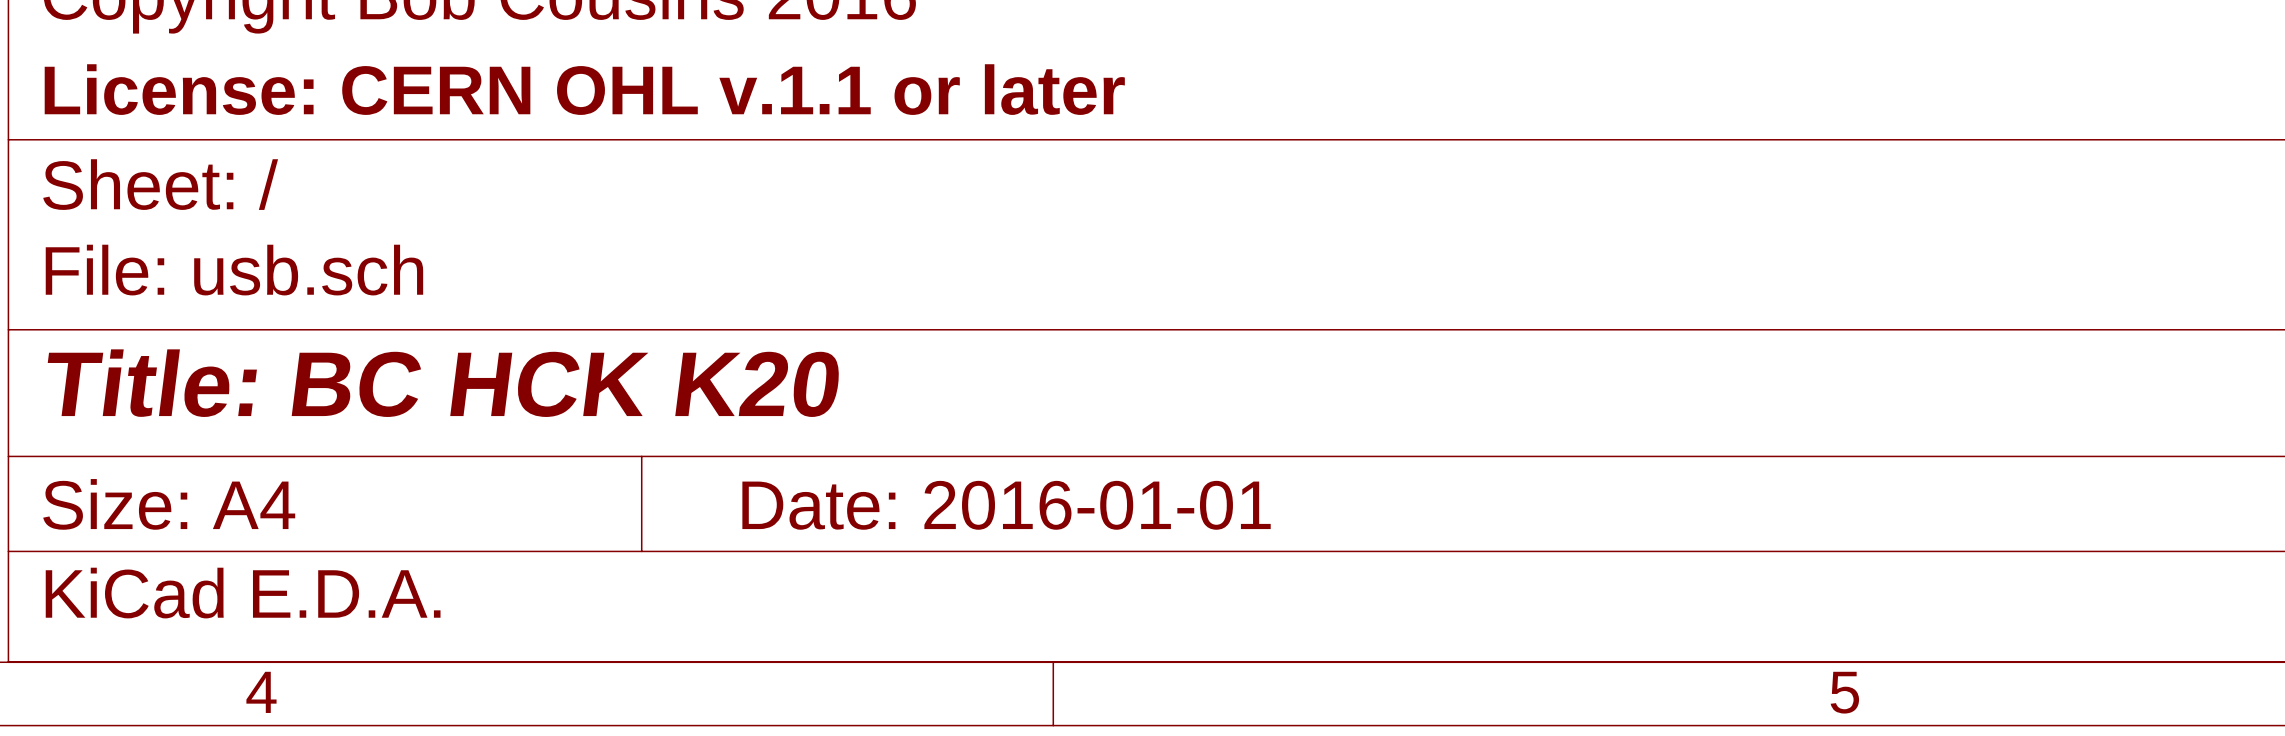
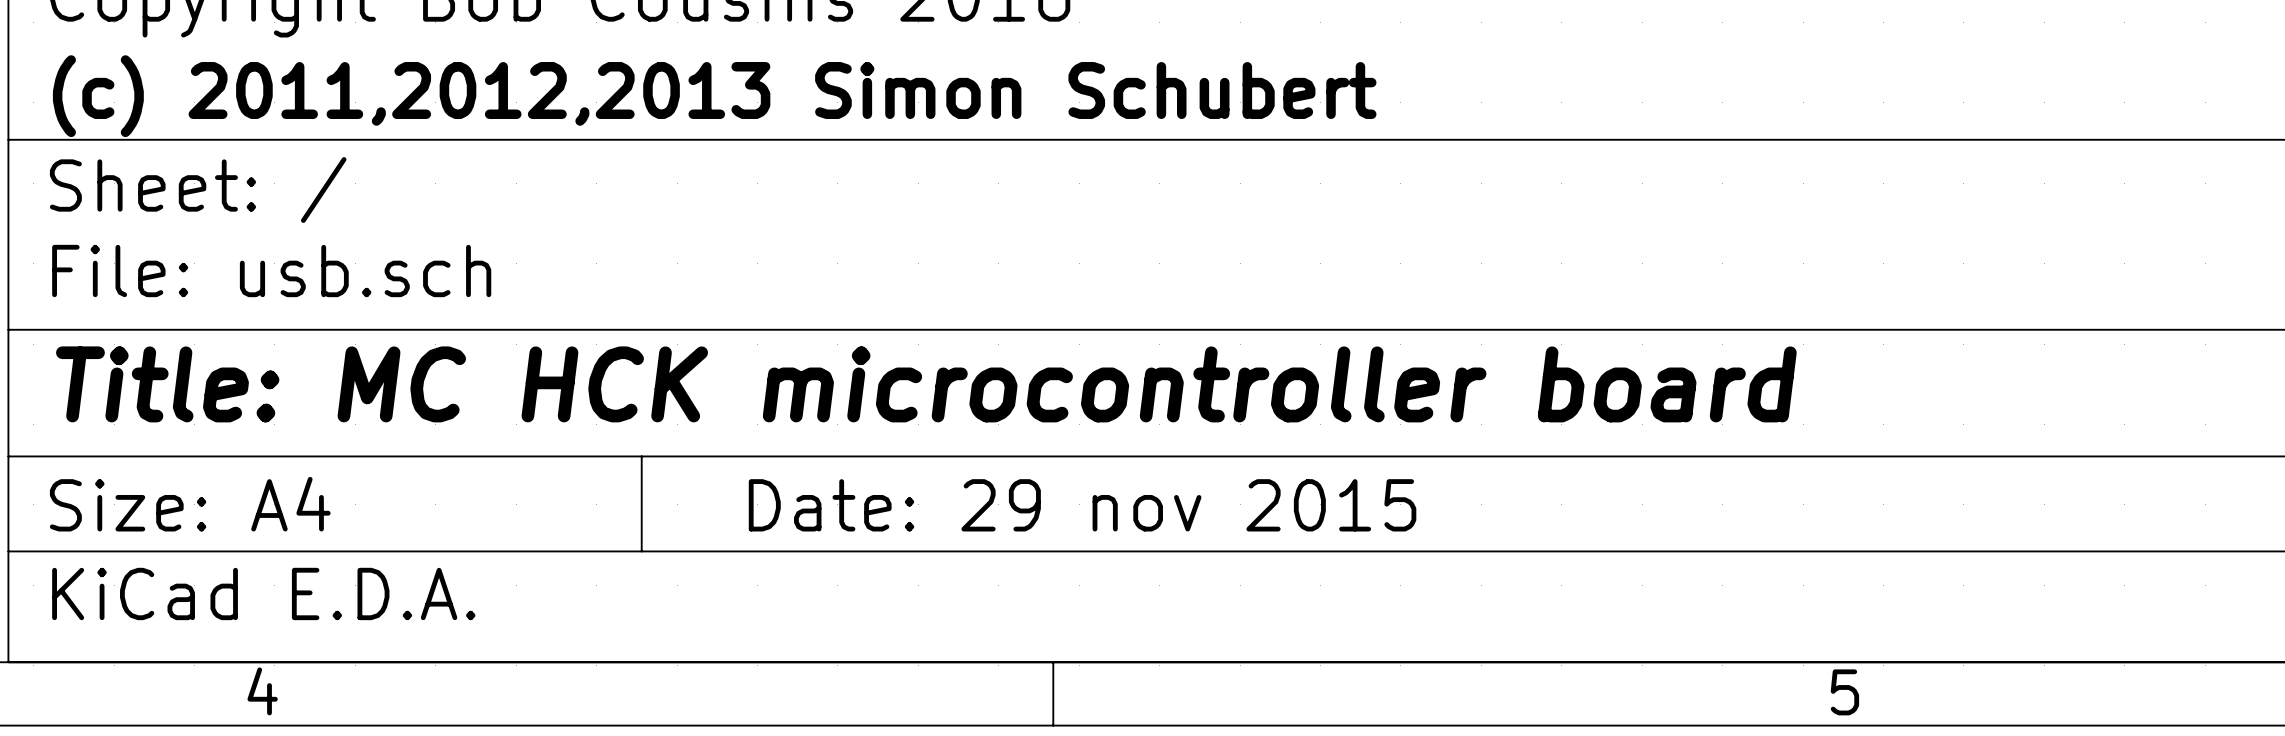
title block: License: CERN OHL v.1.1 or later (584, 89) -> (c) 2011,2012,2013 Simon Schubert (714, 96)
title block: Title: BC HCK K20 (443, 383) -> Title: MC HCK microcontroller board (926, 384)
title block: Date: 2016-01-01 (1006, 505) -> Date: 29 nov 2015 (1082, 505)

